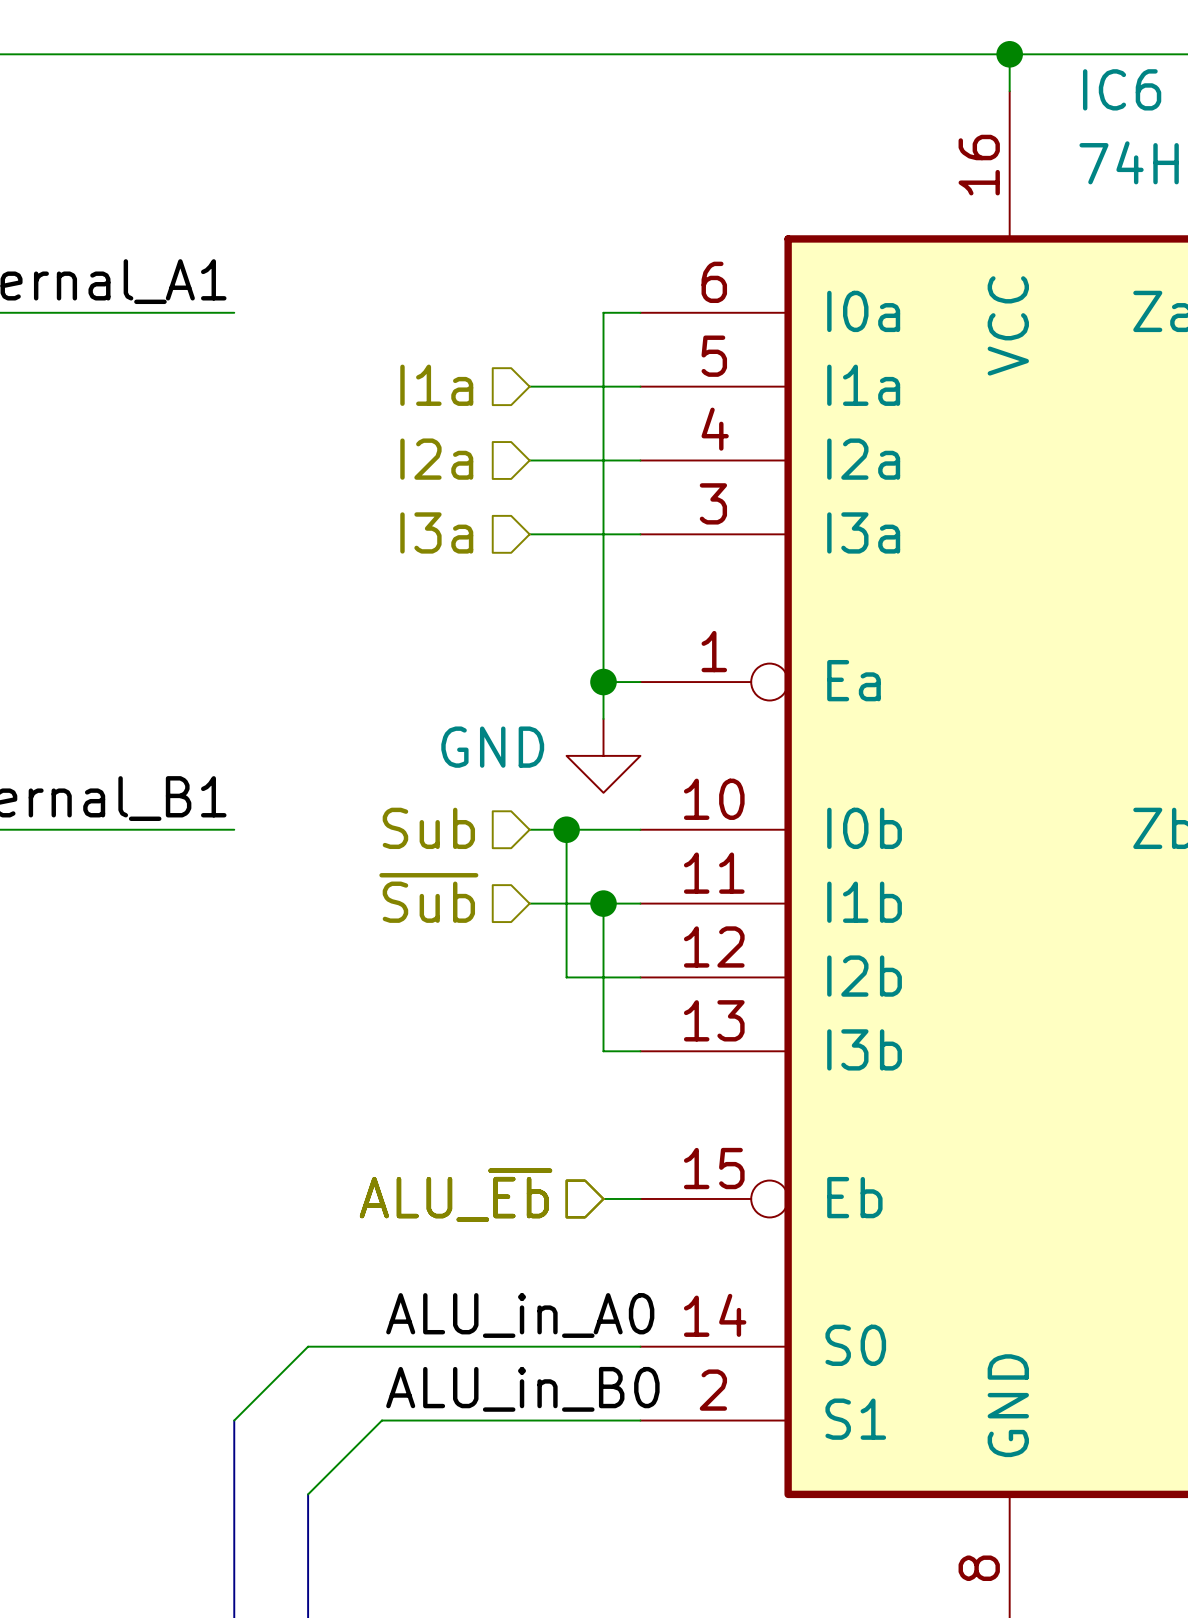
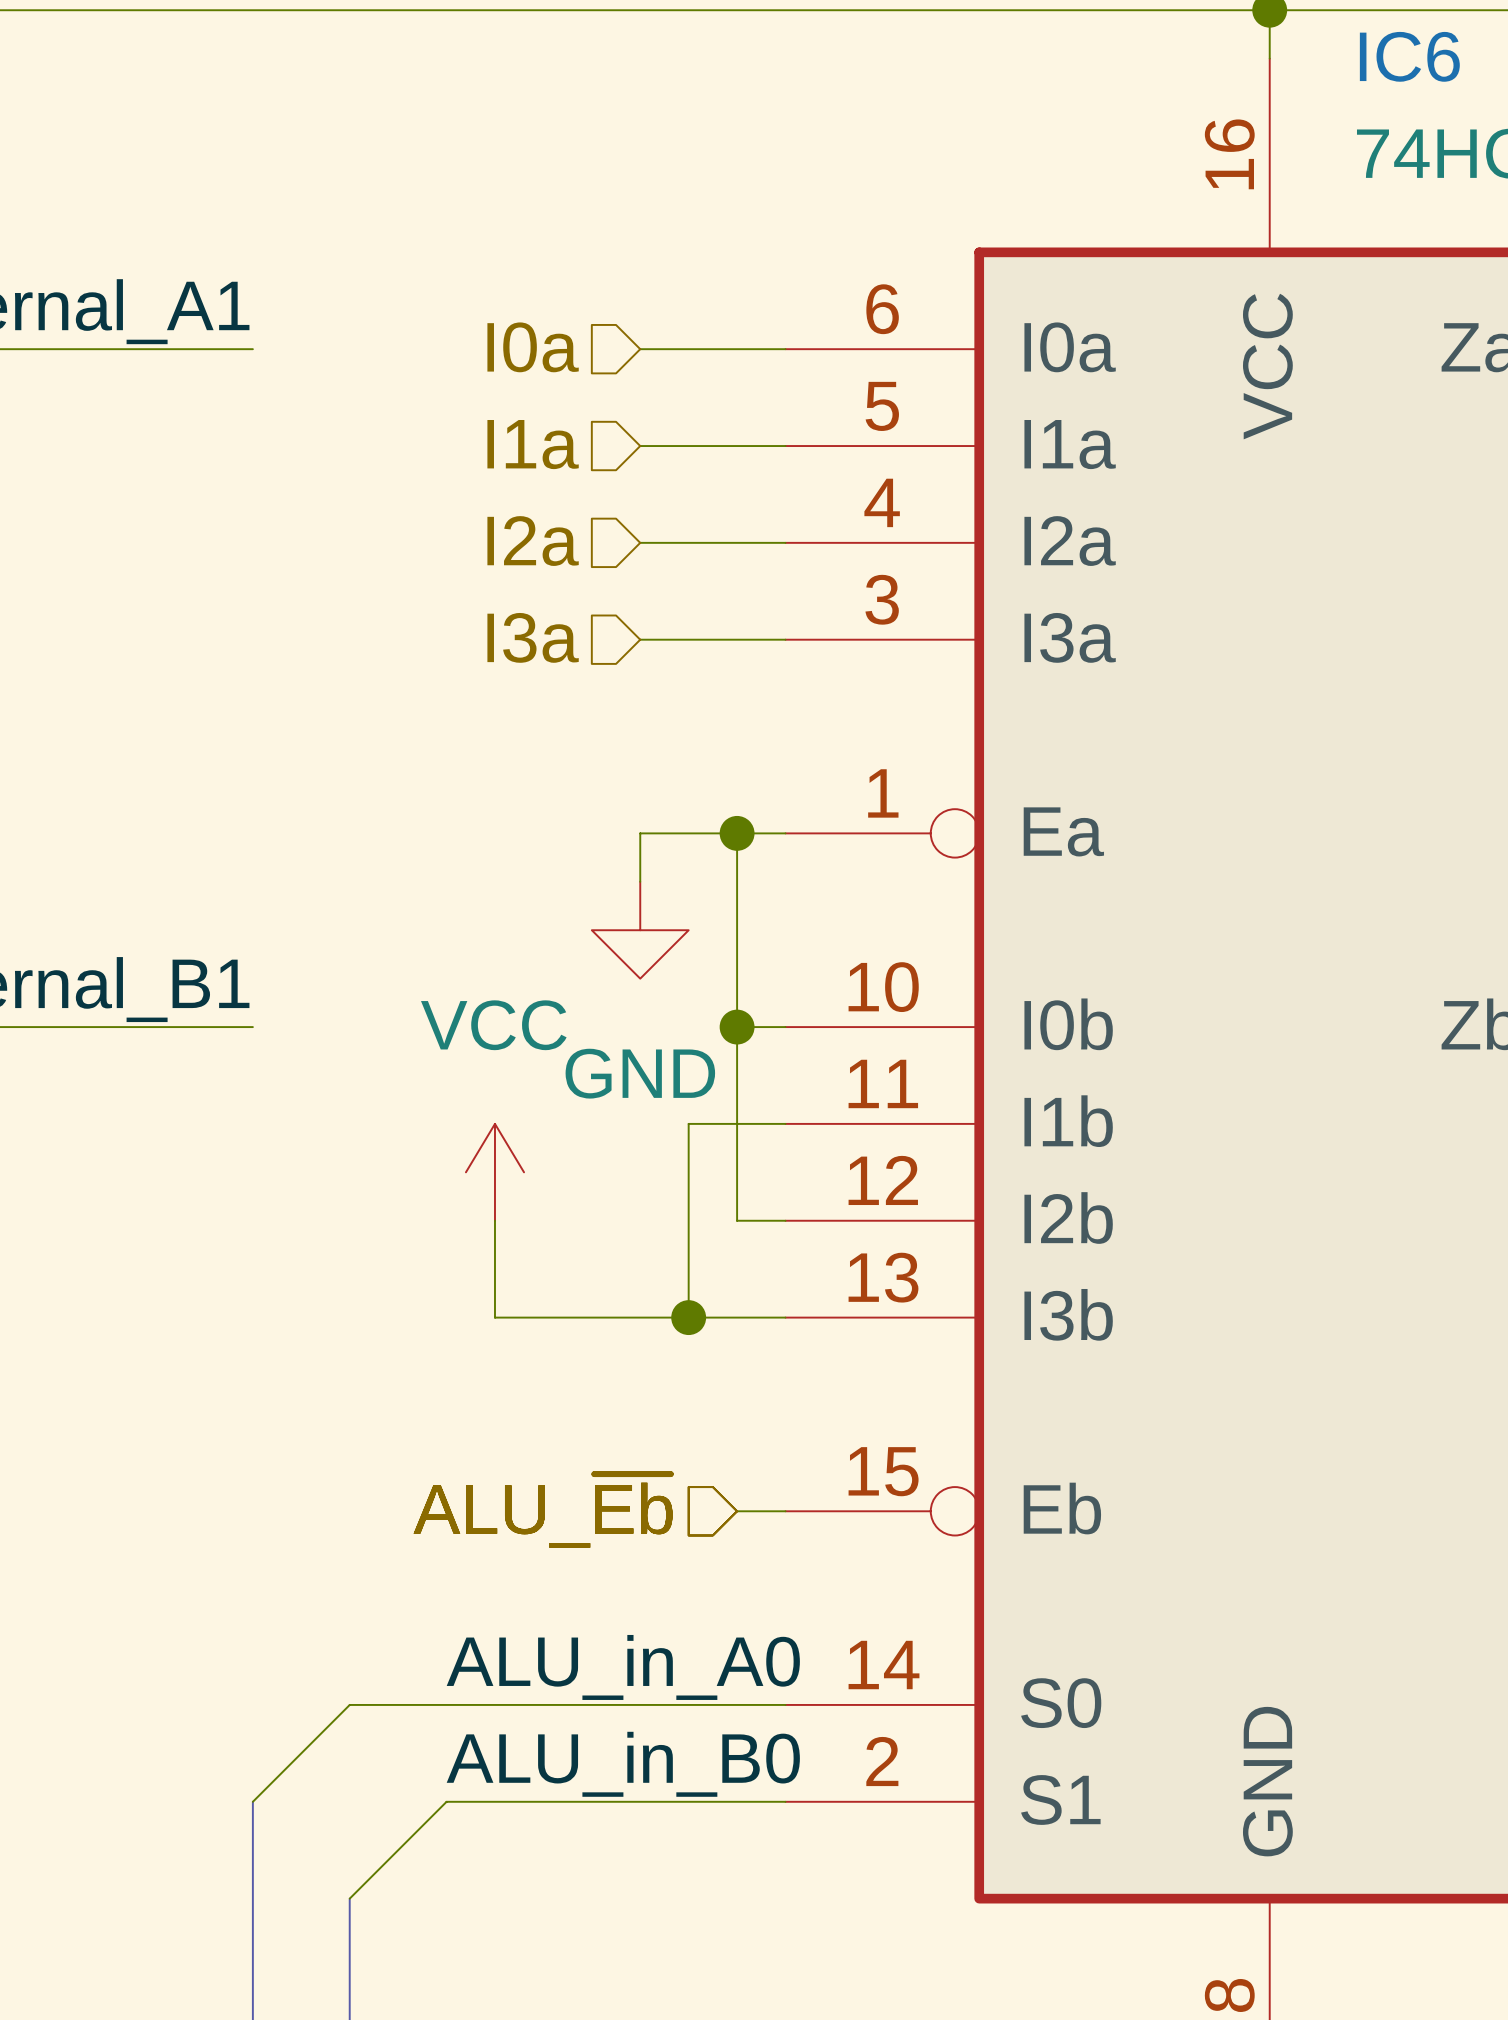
hierarchical label: none -> I0a (533, 347)
wire: (603, 312) (603, 682) -> (737, 349) (640, 349)
wire: none -> (737, 833) (640, 833) (640, 881)
wire: none -> (737, 881) (737, 1123)
power symbol text position: GND (492, 747) -> GND (640, 1073)
power symbol position: GND (603, 755) -> GND (640, 930)
hierarchical label: Sub (428, 828) -> none
wire: (529, 829) (603, 829) -> none
wire: (566, 829) (566, 903) (529, 903) -> none
junction: (566, 829) -> none
junction: none -> (737, 1027)
hierarchical label: ~{Sub} (428, 897) -> none
junction: (603, 903) -> none
power symbol: none -> VCC (494, 1172)
wire: none -> (494, 1220) (494, 1317) (737, 1317)
wire: (566, 977) (603, 977) (603, 1051) -> (688, 1220) (688, 1317)
junction: none -> (688, 1317)

